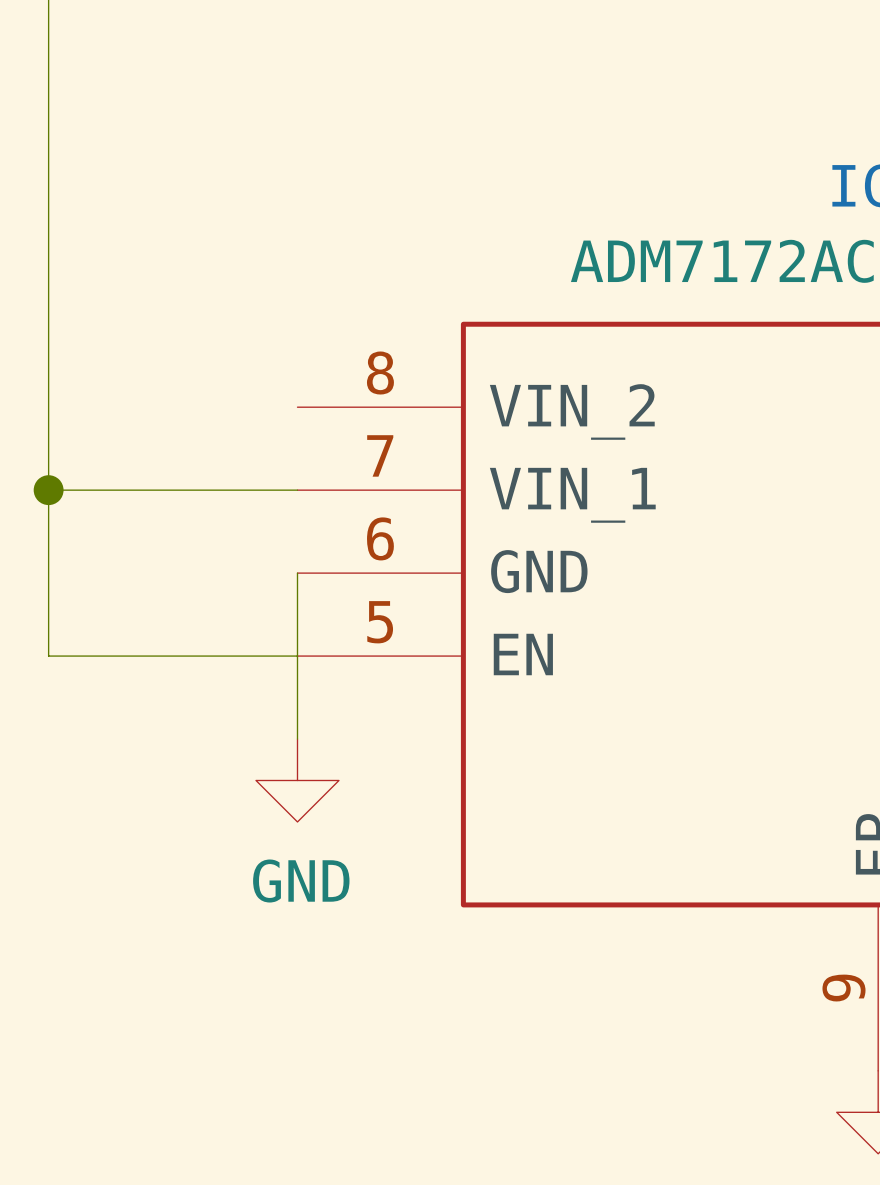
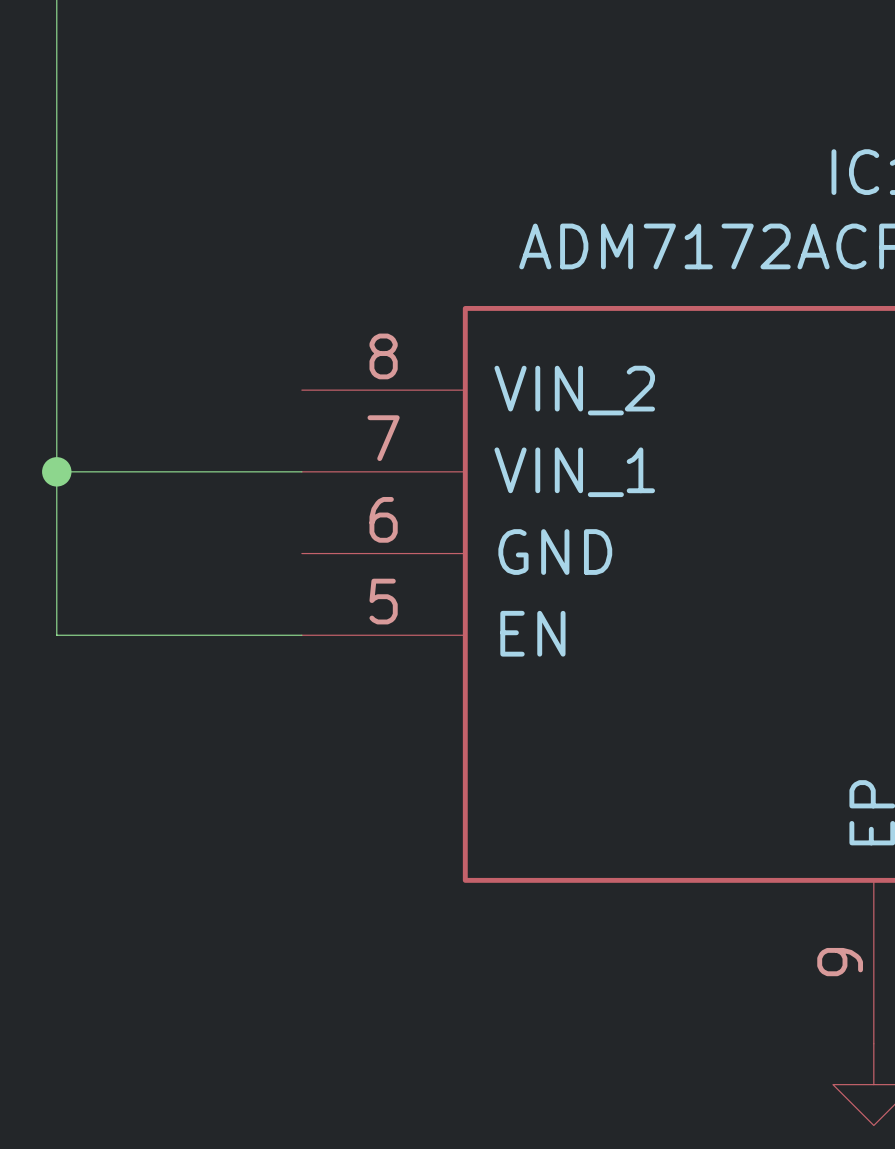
wire: (297, 573) (297, 739) -> none
power symbol: GND (297, 780) -> none

